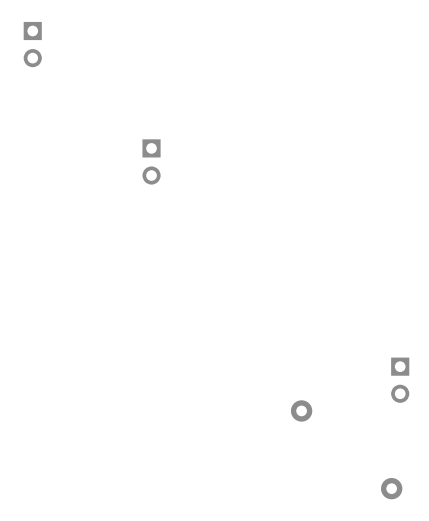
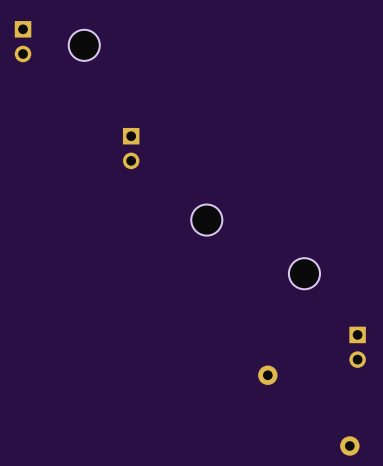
part: none -> (84, 45)
part: none -> (206, 220)
part: none -> (304, 273)

